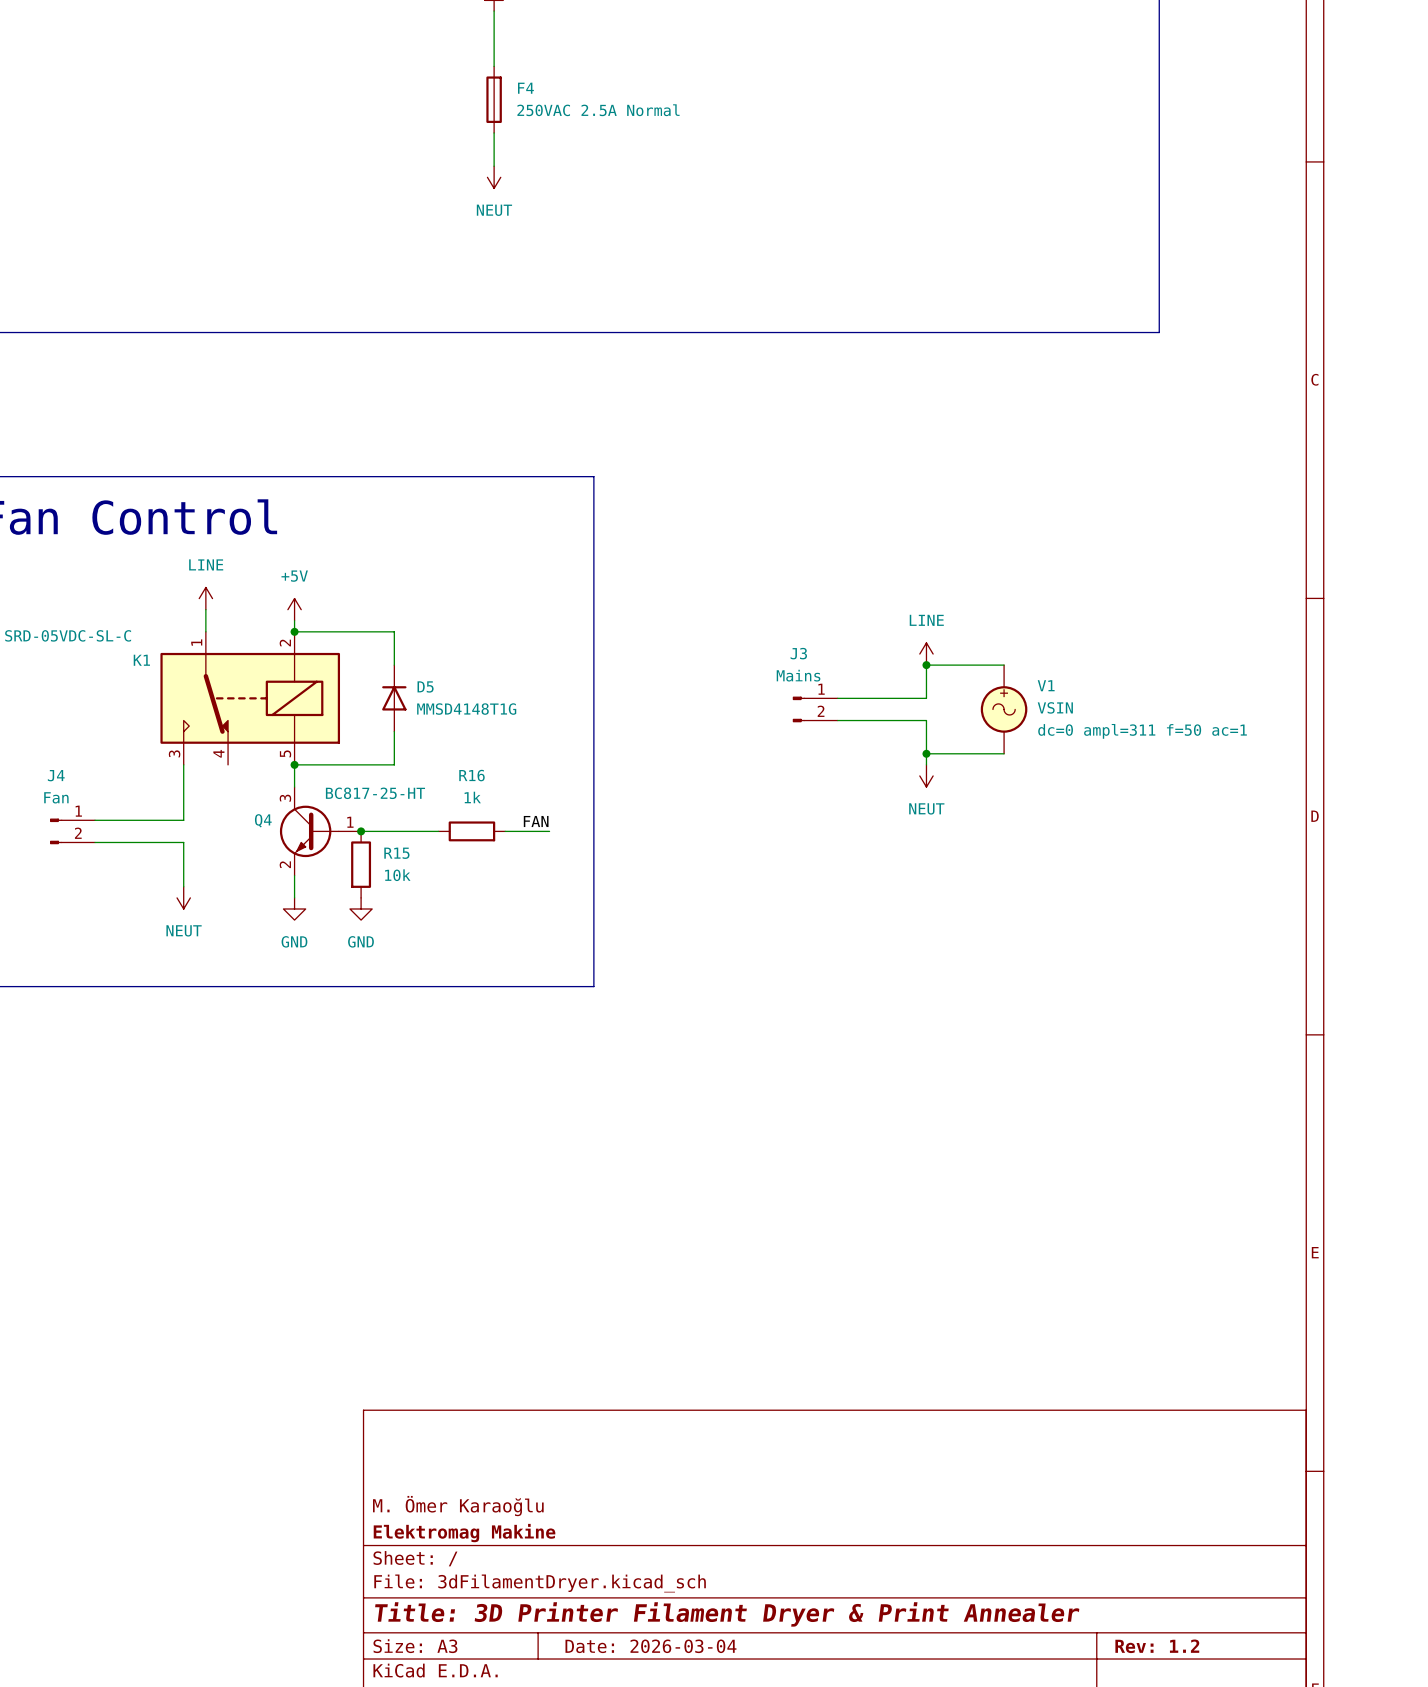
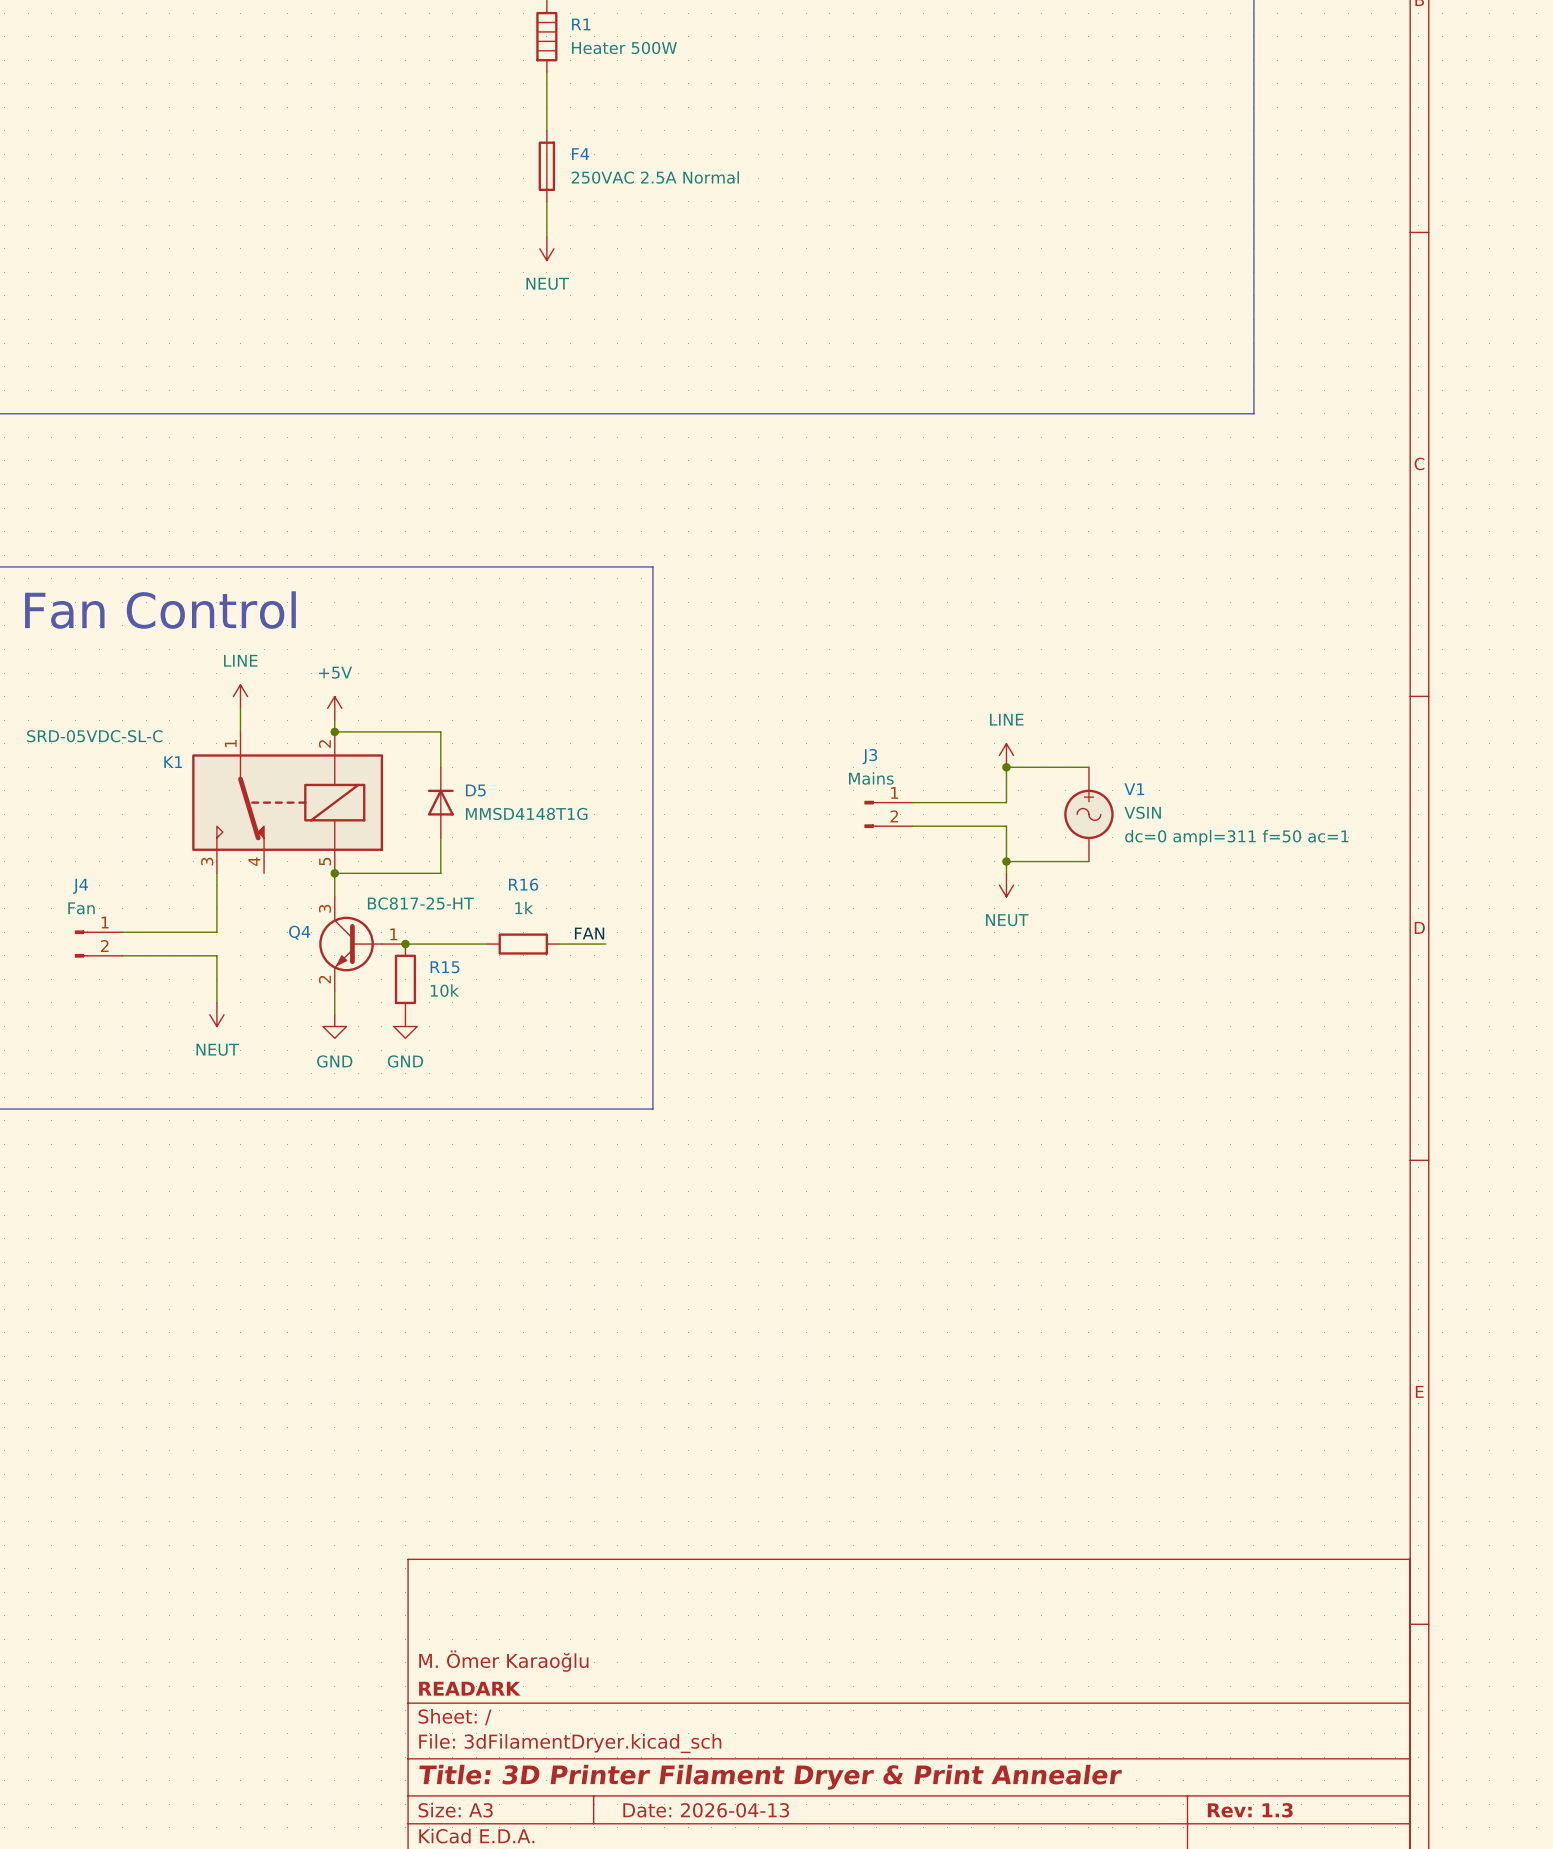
title block: Elektromag Makine (464, 1533) -> READARK (469, 1688)
title block: Date: 2026-03-04 (650, 1646) -> Date: 2026-04-13 (706, 1810)
title block: Rev: 1.2 (1157, 1646) -> Rev: 1.3 (1250, 1810)

